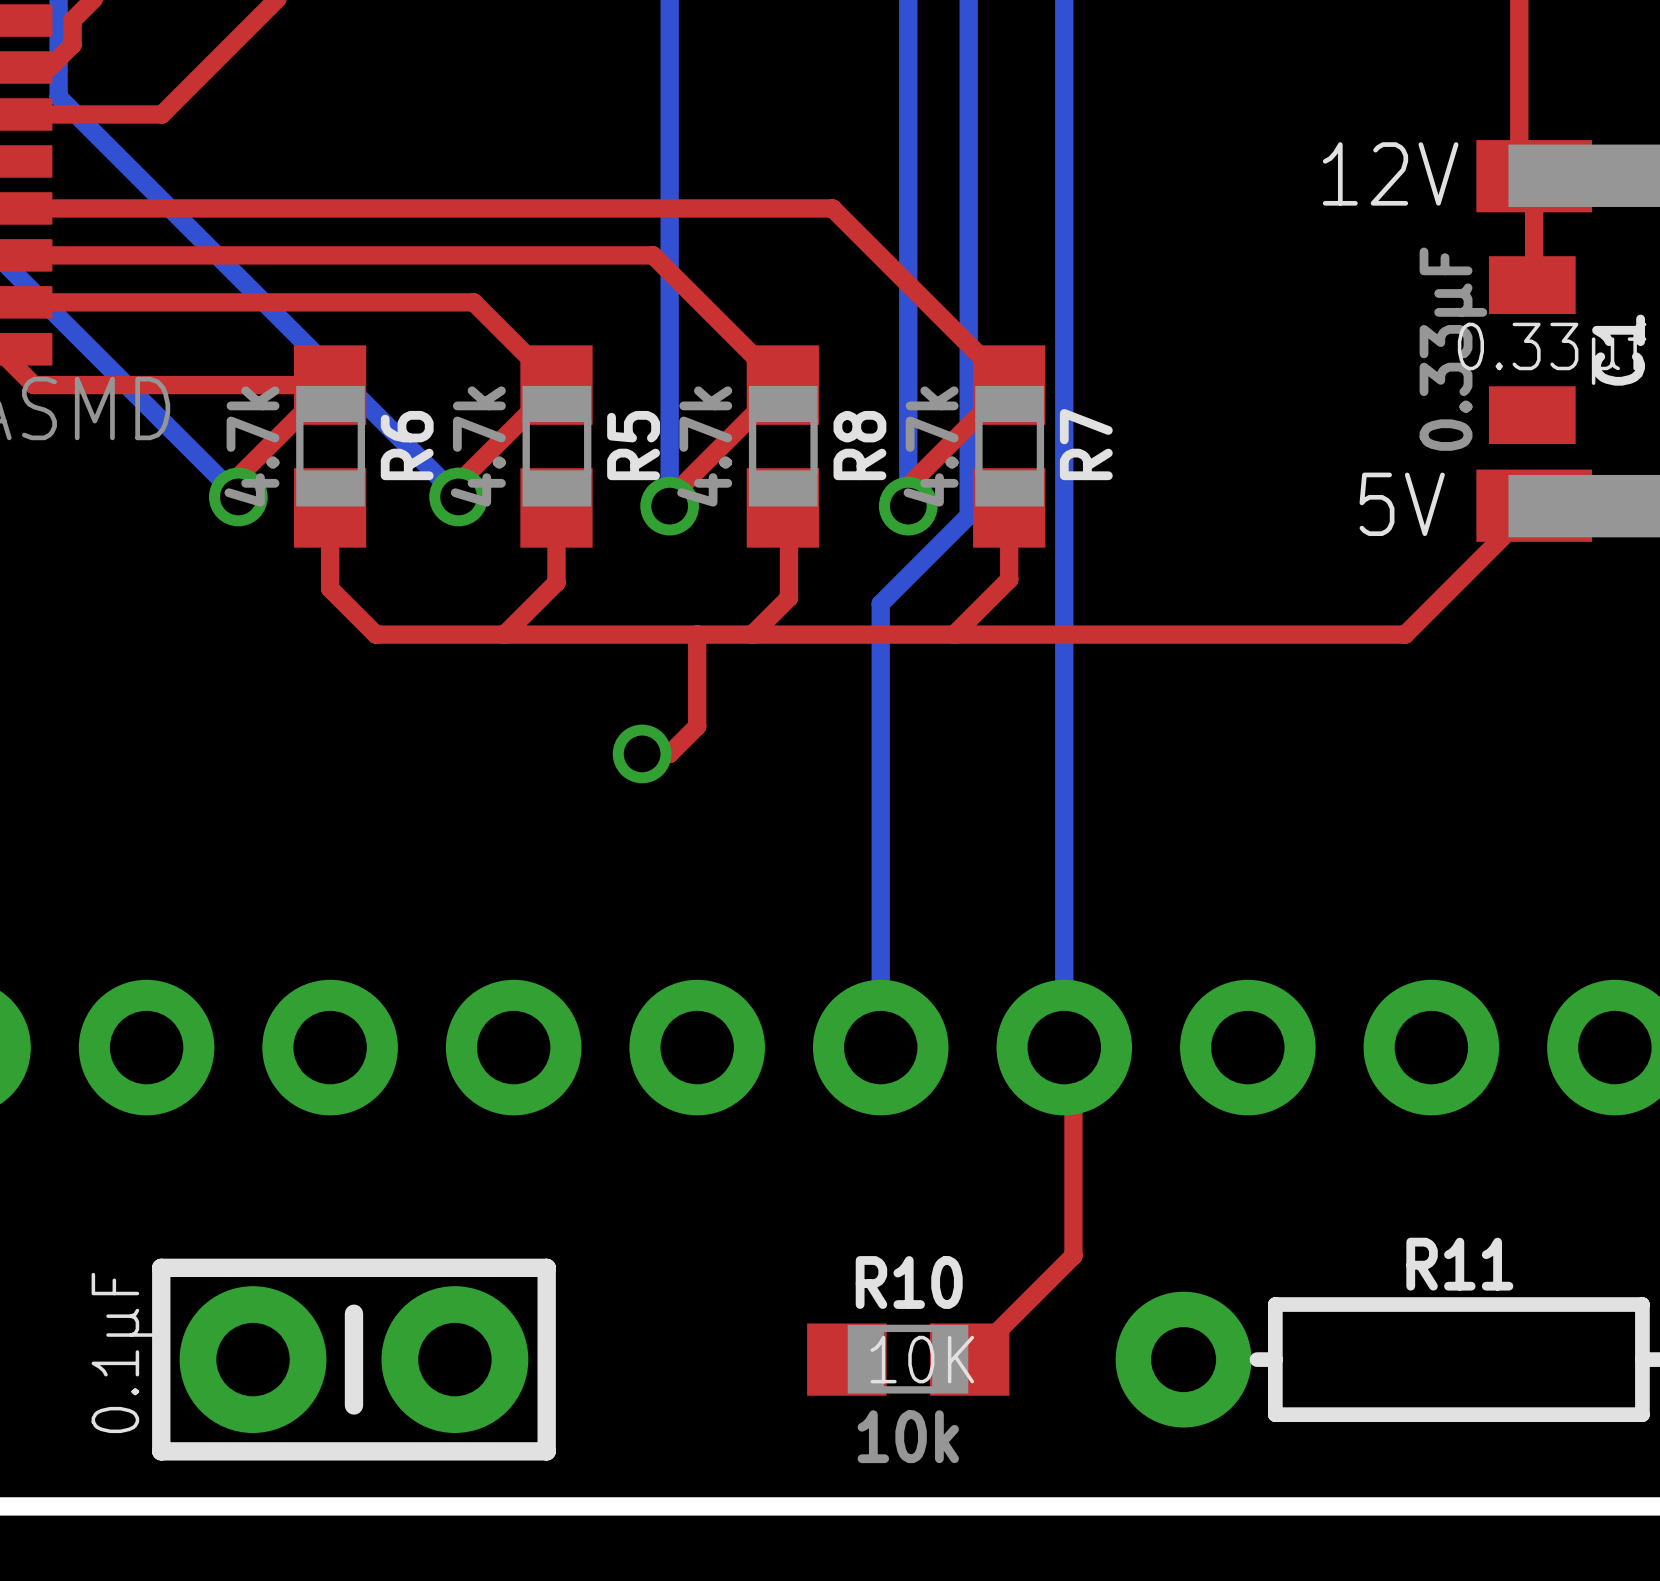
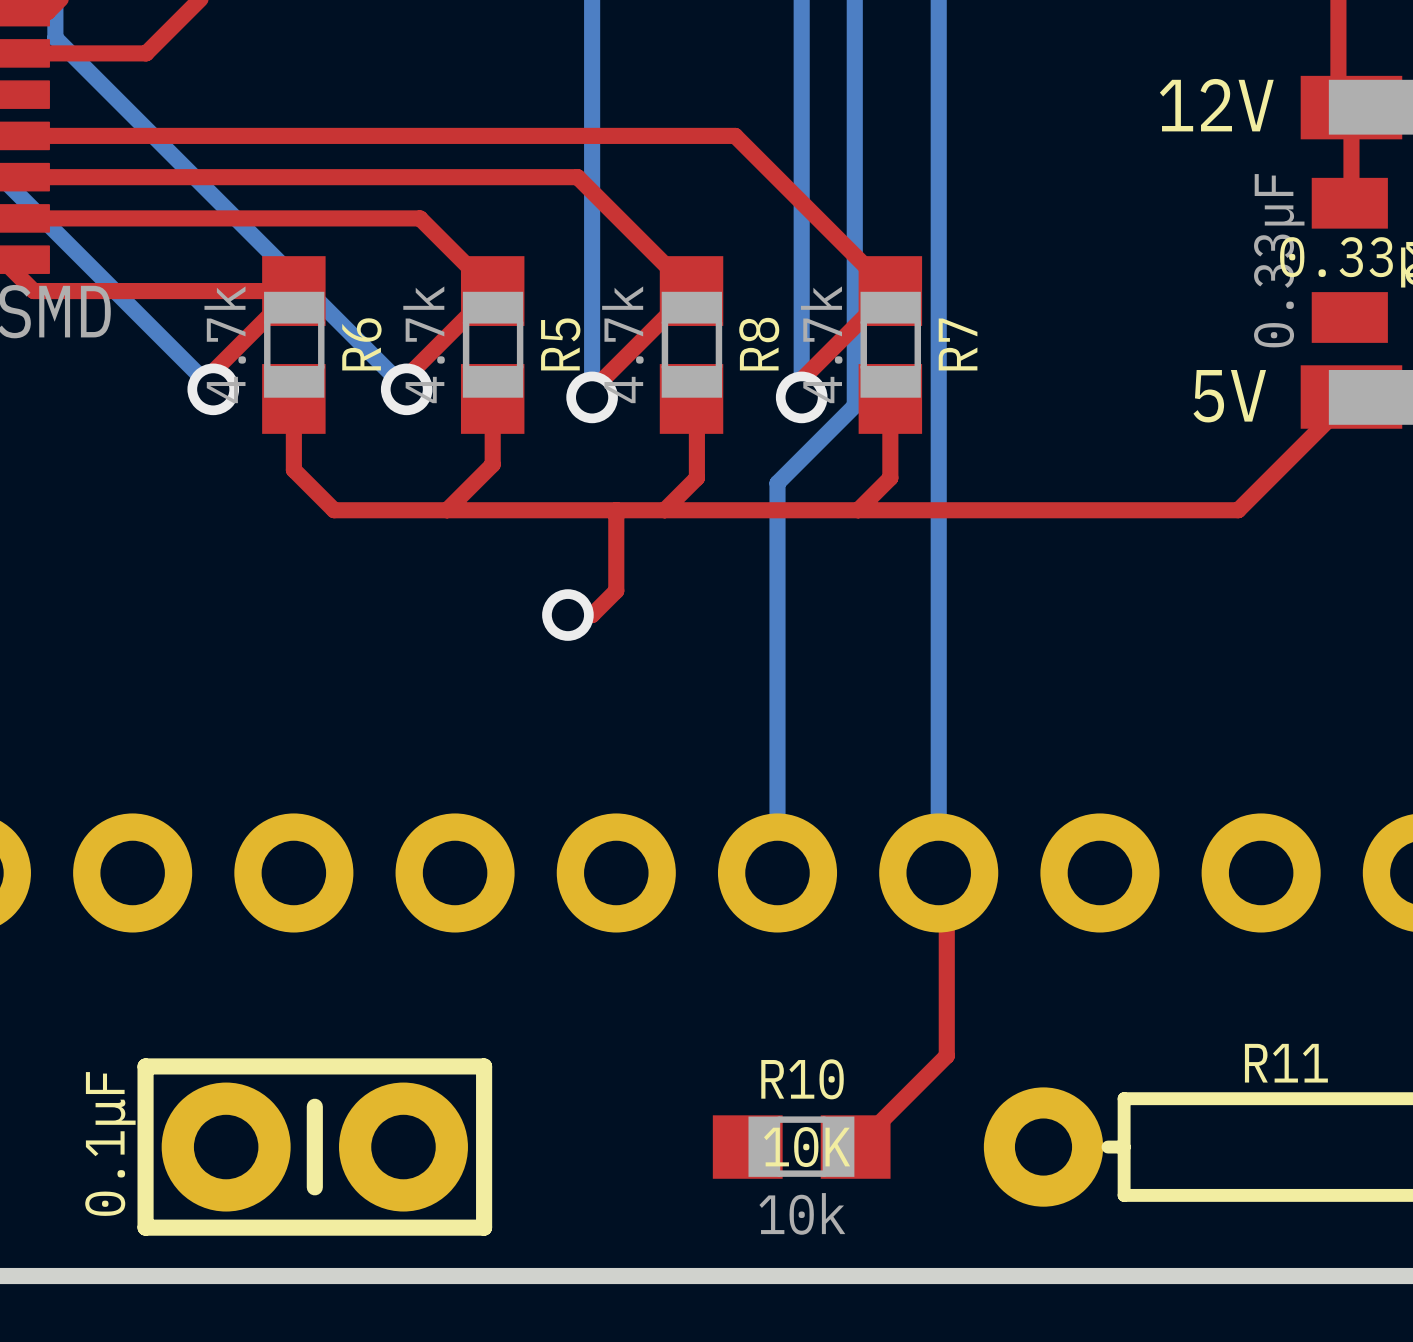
top track: (1009, 579) (954, 634) -> (890, 461) (890, 478) (858, 510)

